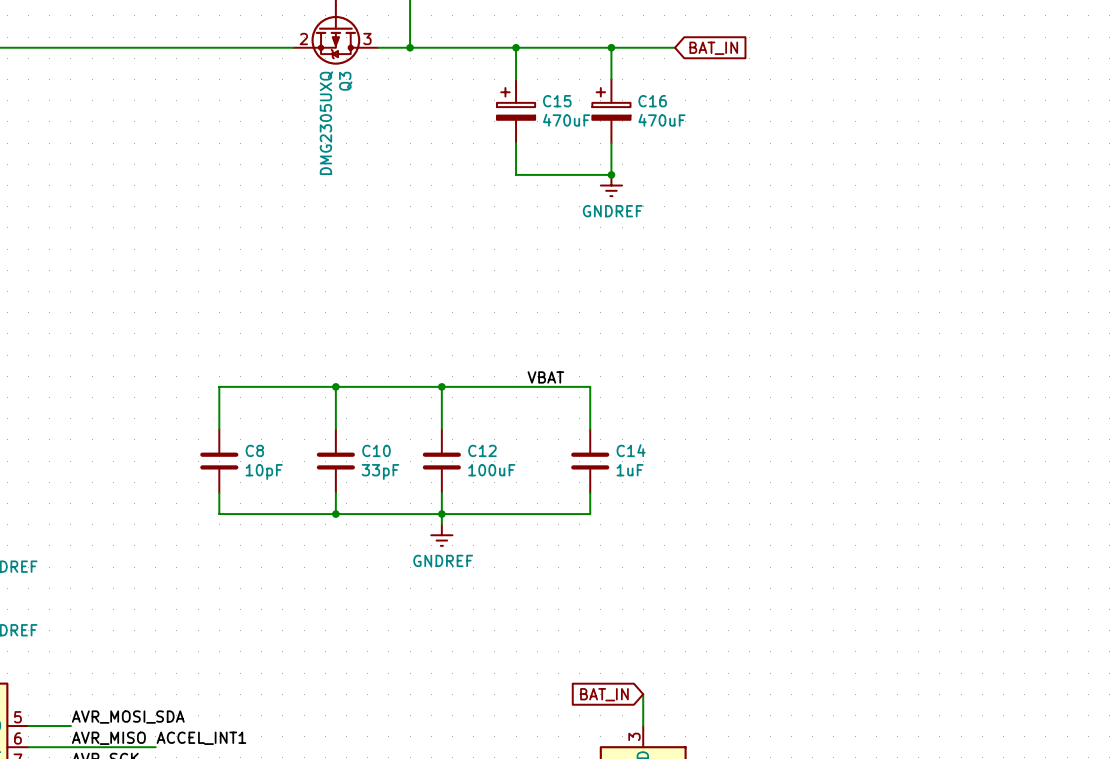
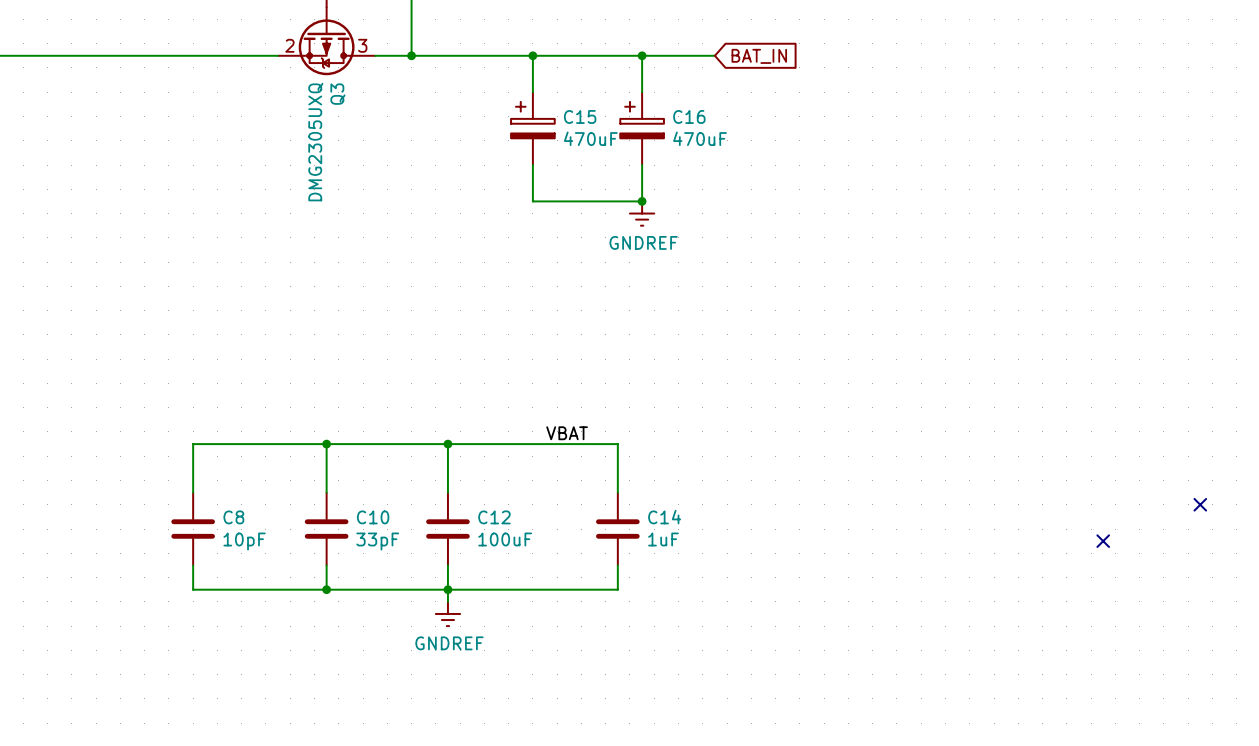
no-connect mark: none -> (1200, 504)
no-connect mark: none -> (1103, 541)

